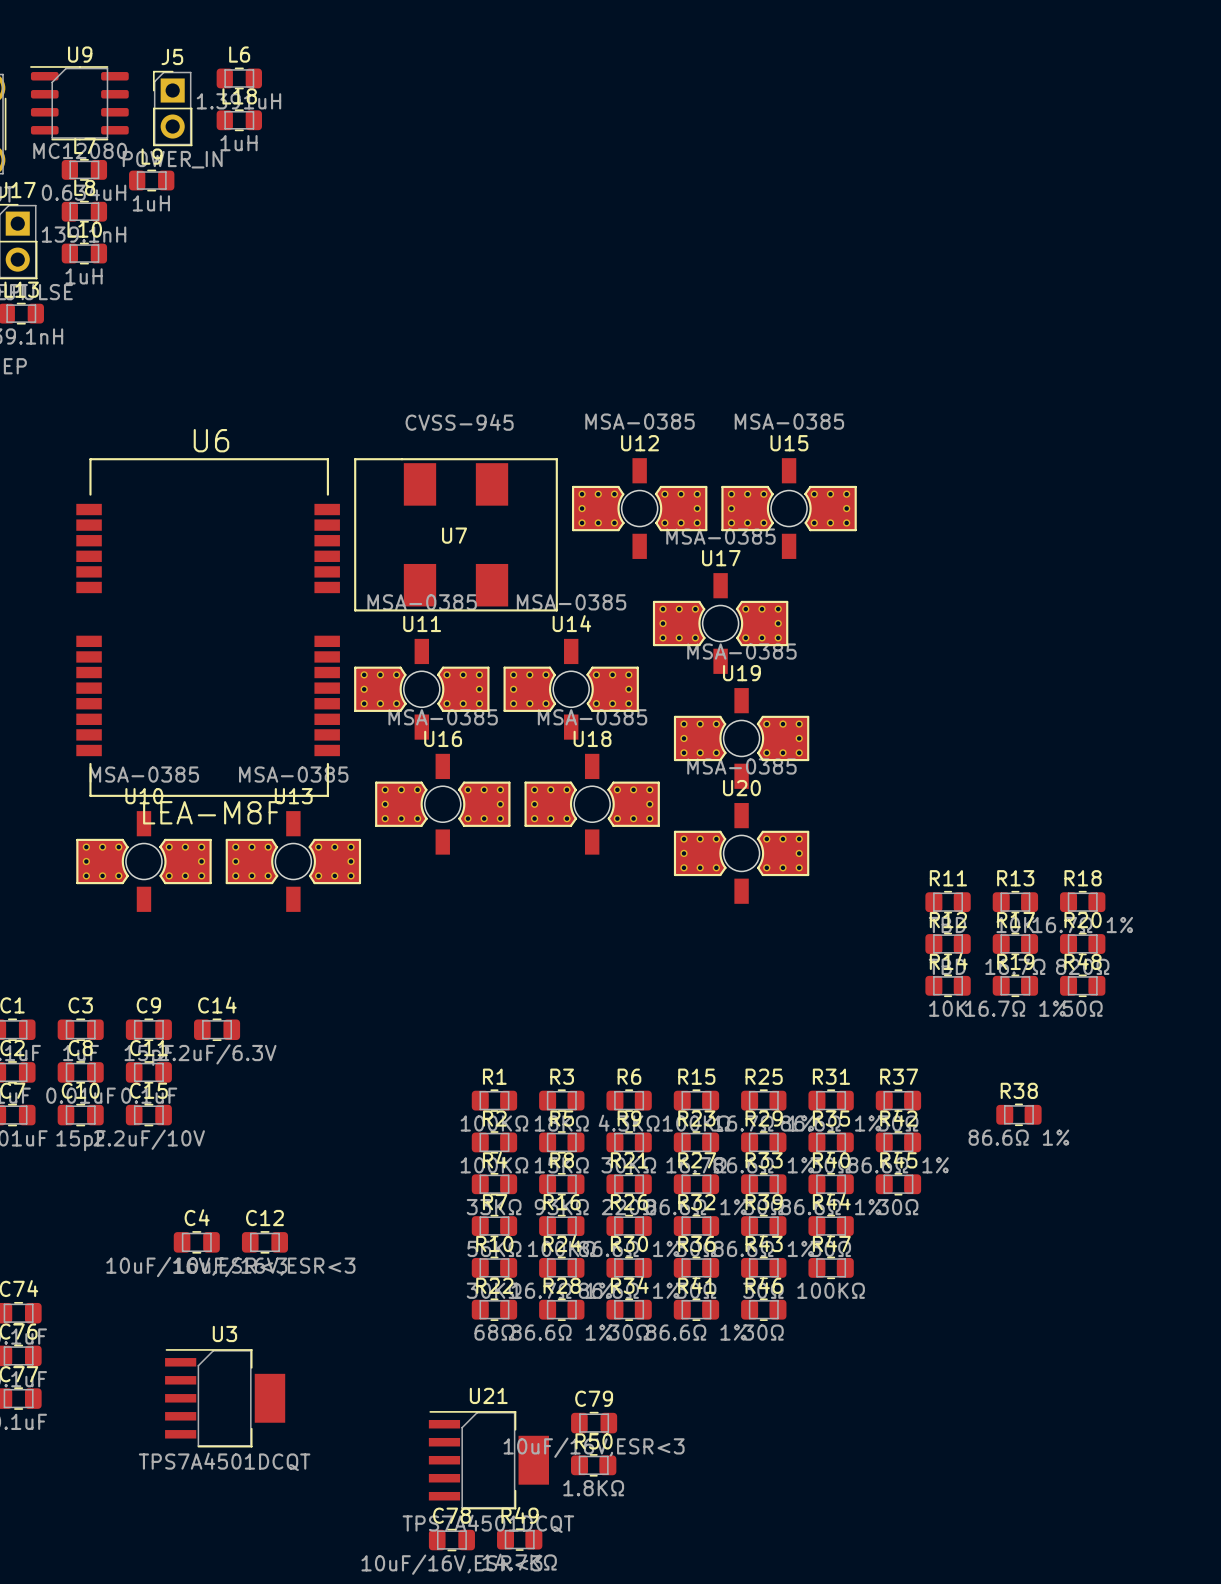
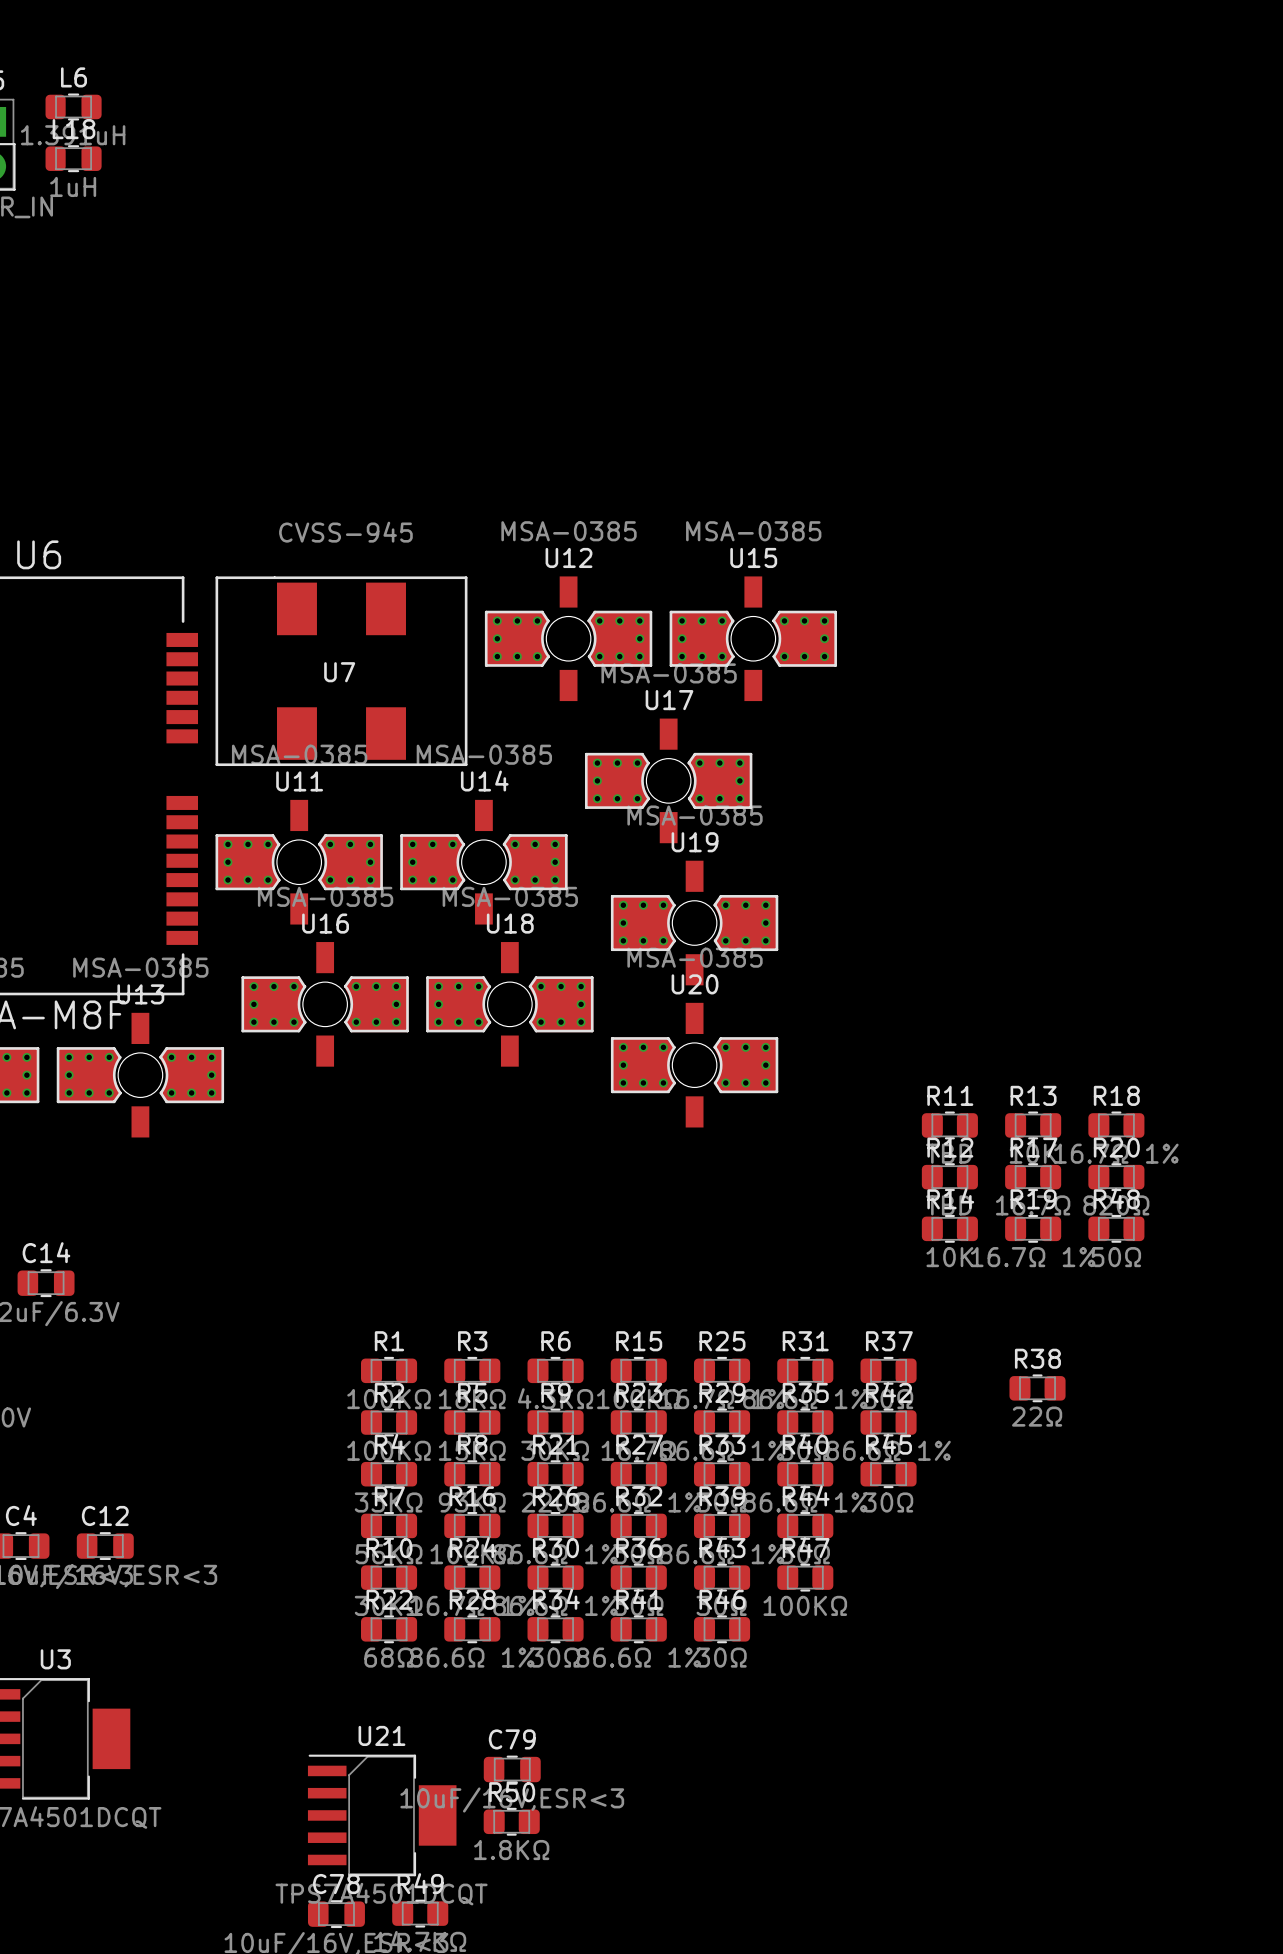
R38 value: 86.6Ω 1% (1018, 1137) -> 22Ω (1037, 1416)

